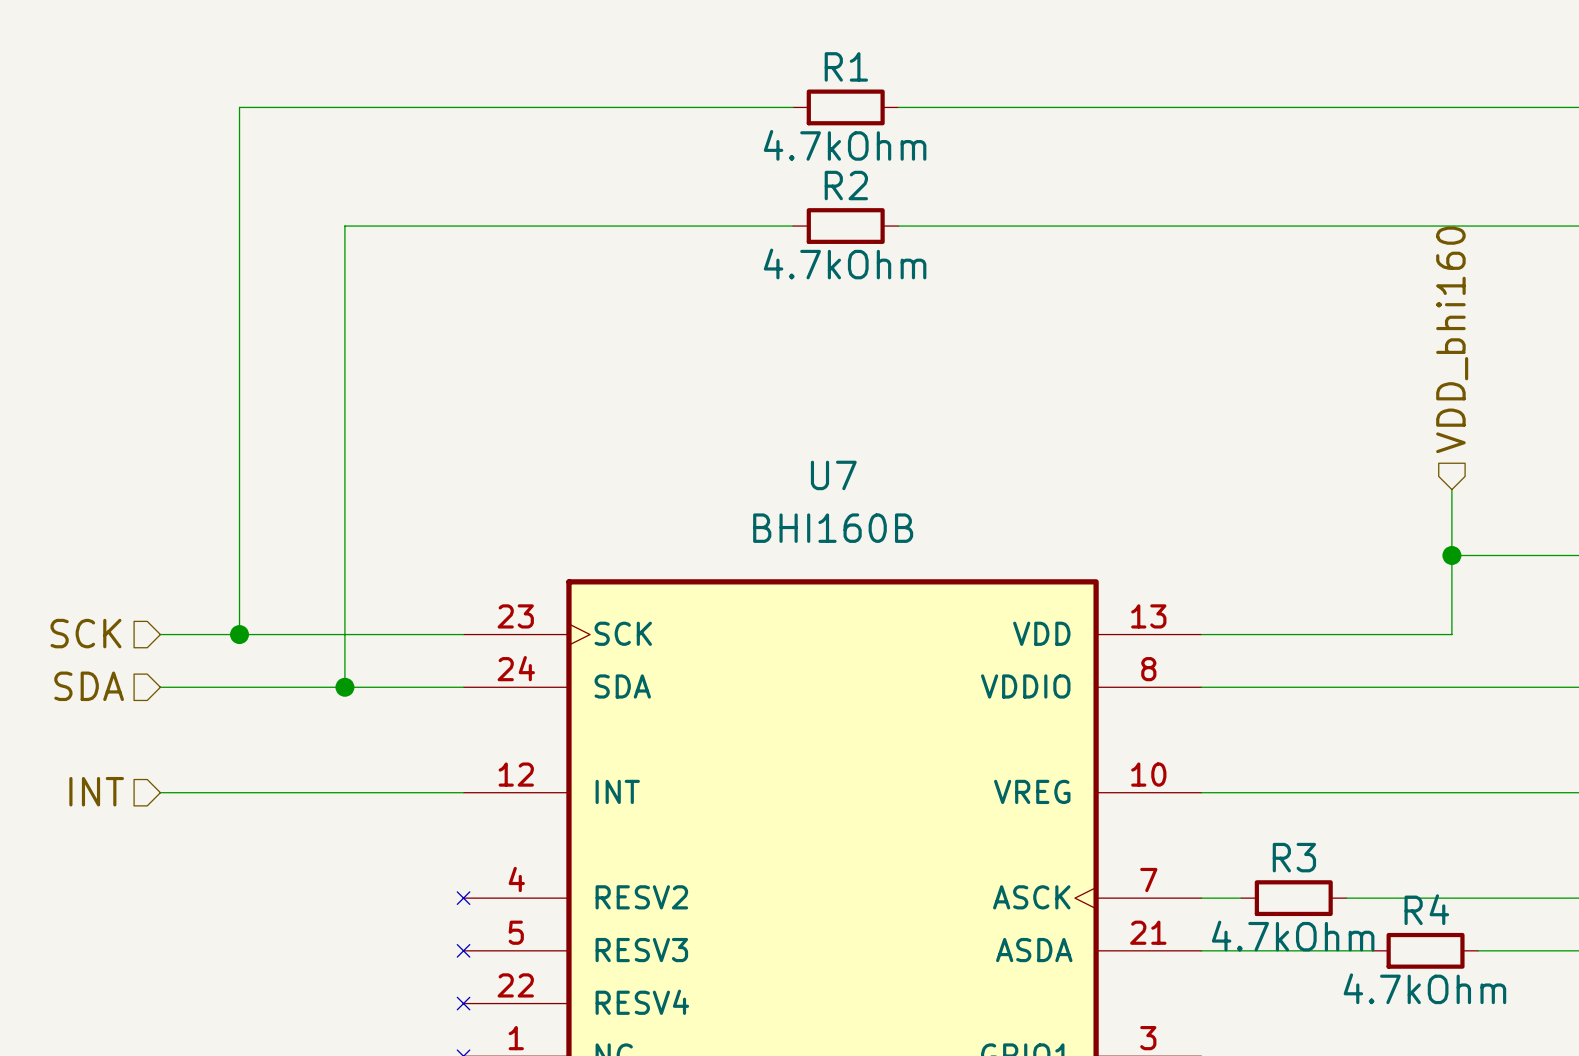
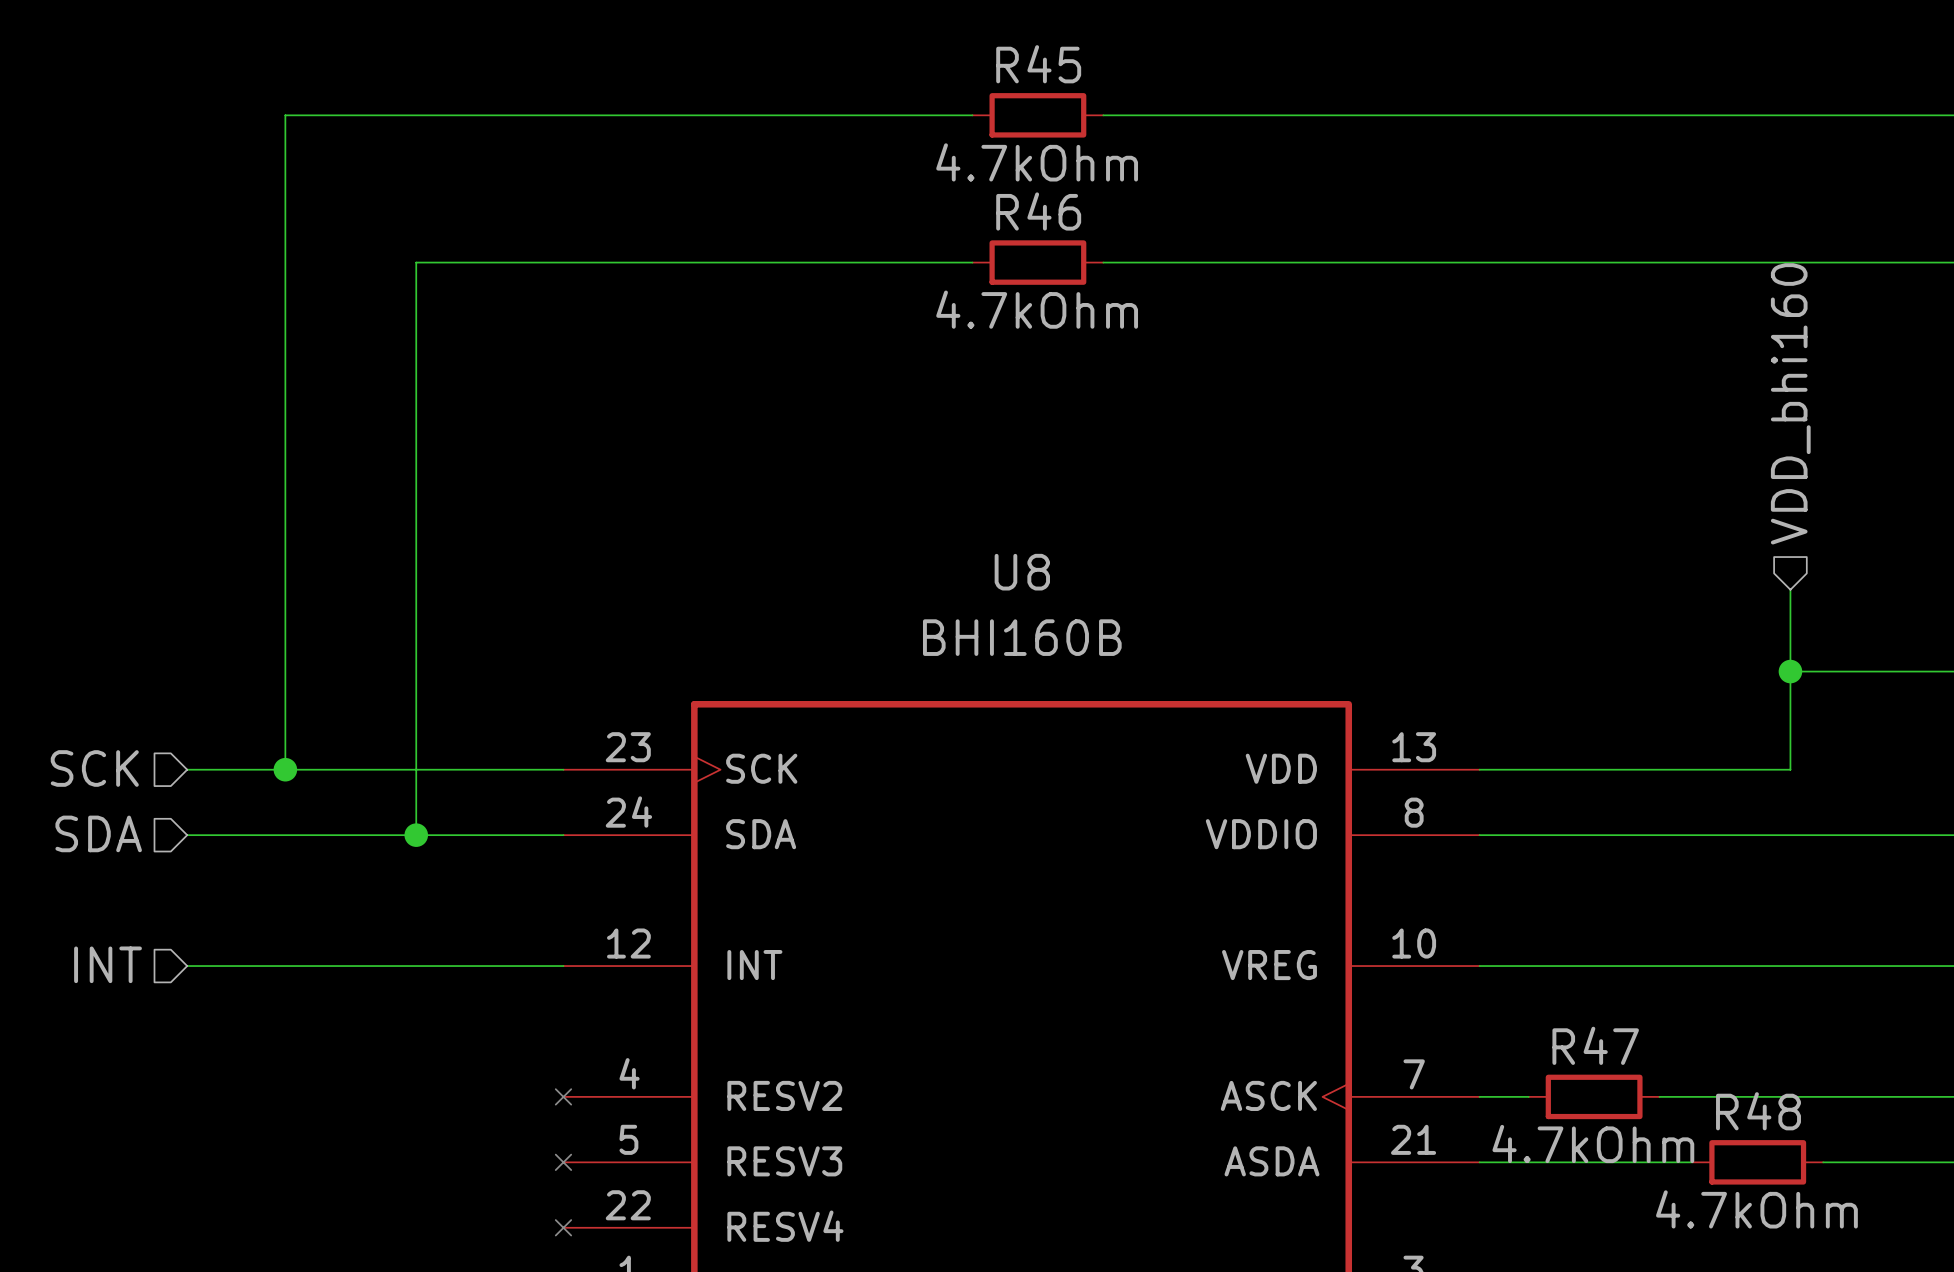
R1 name: R1 (846, 66) -> R45 (1038, 64)
R2 name: R2 (846, 185) -> R46 (1038, 211)
U7 name: U7 (833, 475) -> U8 (1022, 572)
R3 name: R3 (1294, 857) -> R47 (1595, 1045)
R4 name: R4 (1426, 909) -> R48 (1758, 1111)

